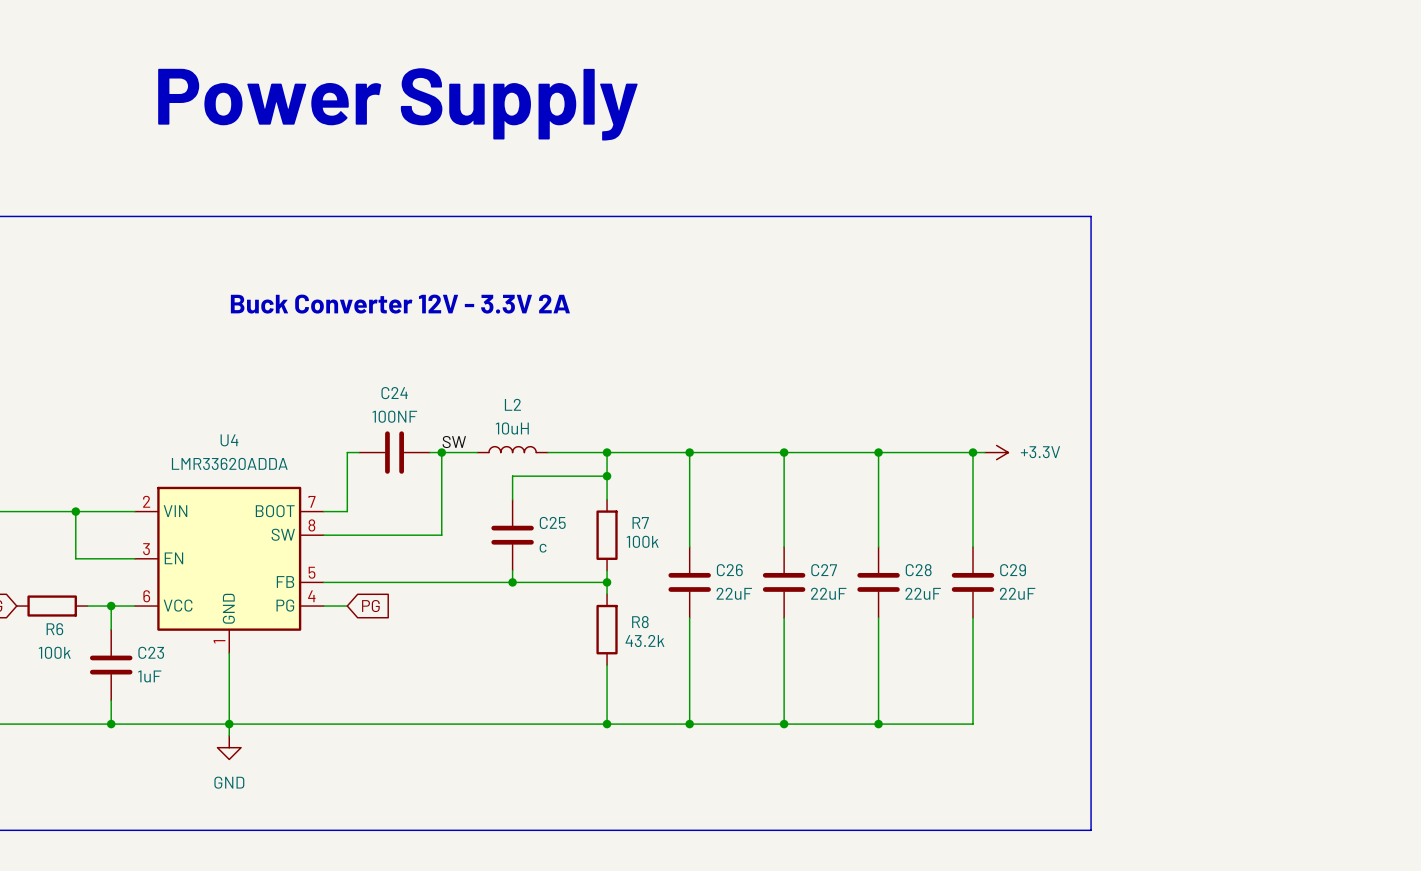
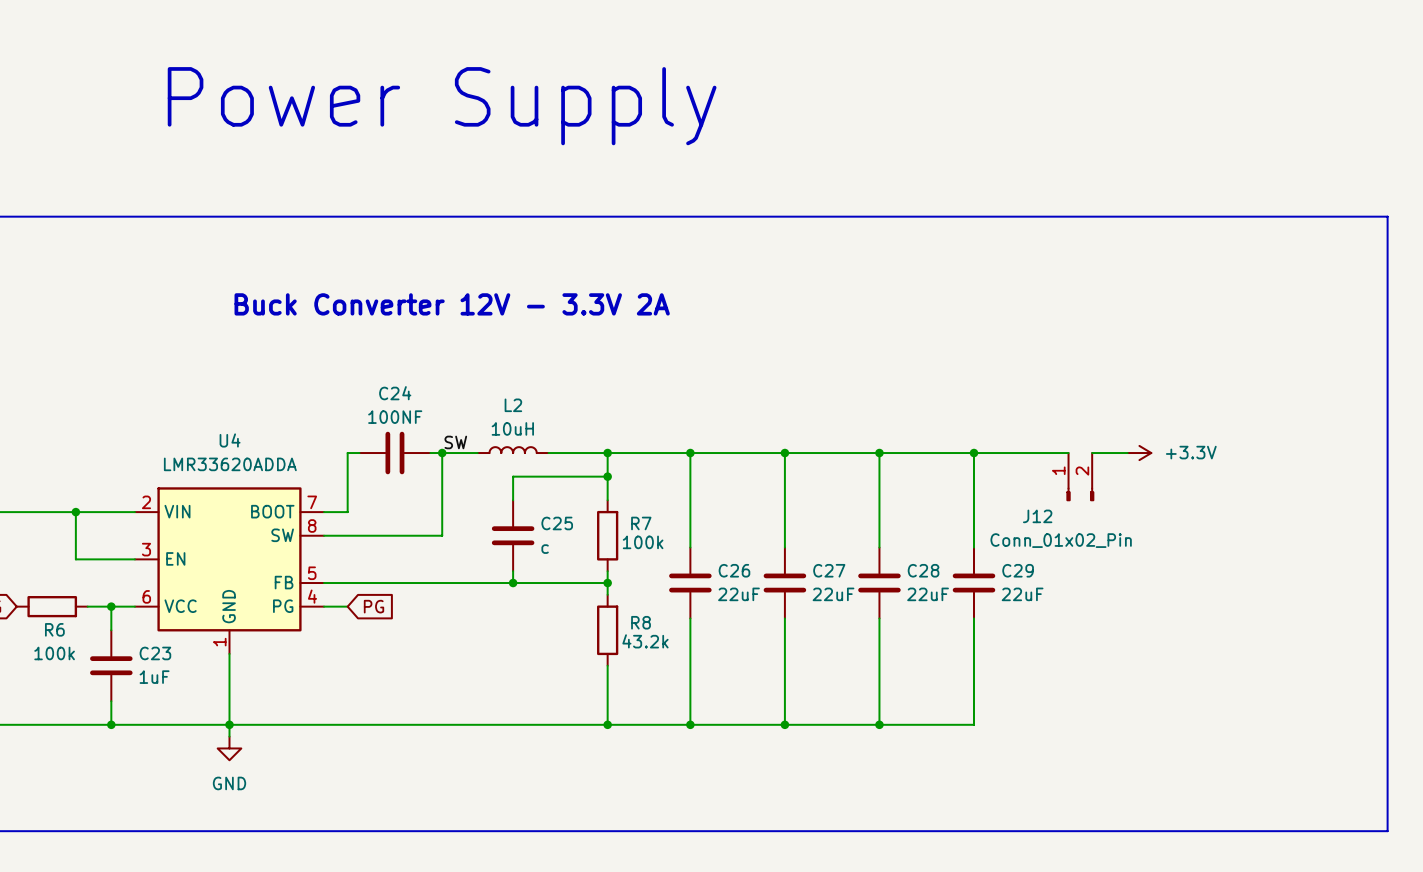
line: (1091, 216) (1091, 830) -> (1092, 216) (1387, 216) (1387, 831) (1092, 831)
wire: none -> (985, 453) (1068, 453)
power symbol position: +3.3V (996, 452) -> +3.3V (1139, 453)
wire: none -> (1092, 453) (1127, 453)
J12: none -> Conn_01x02_Pin (1080, 477)

